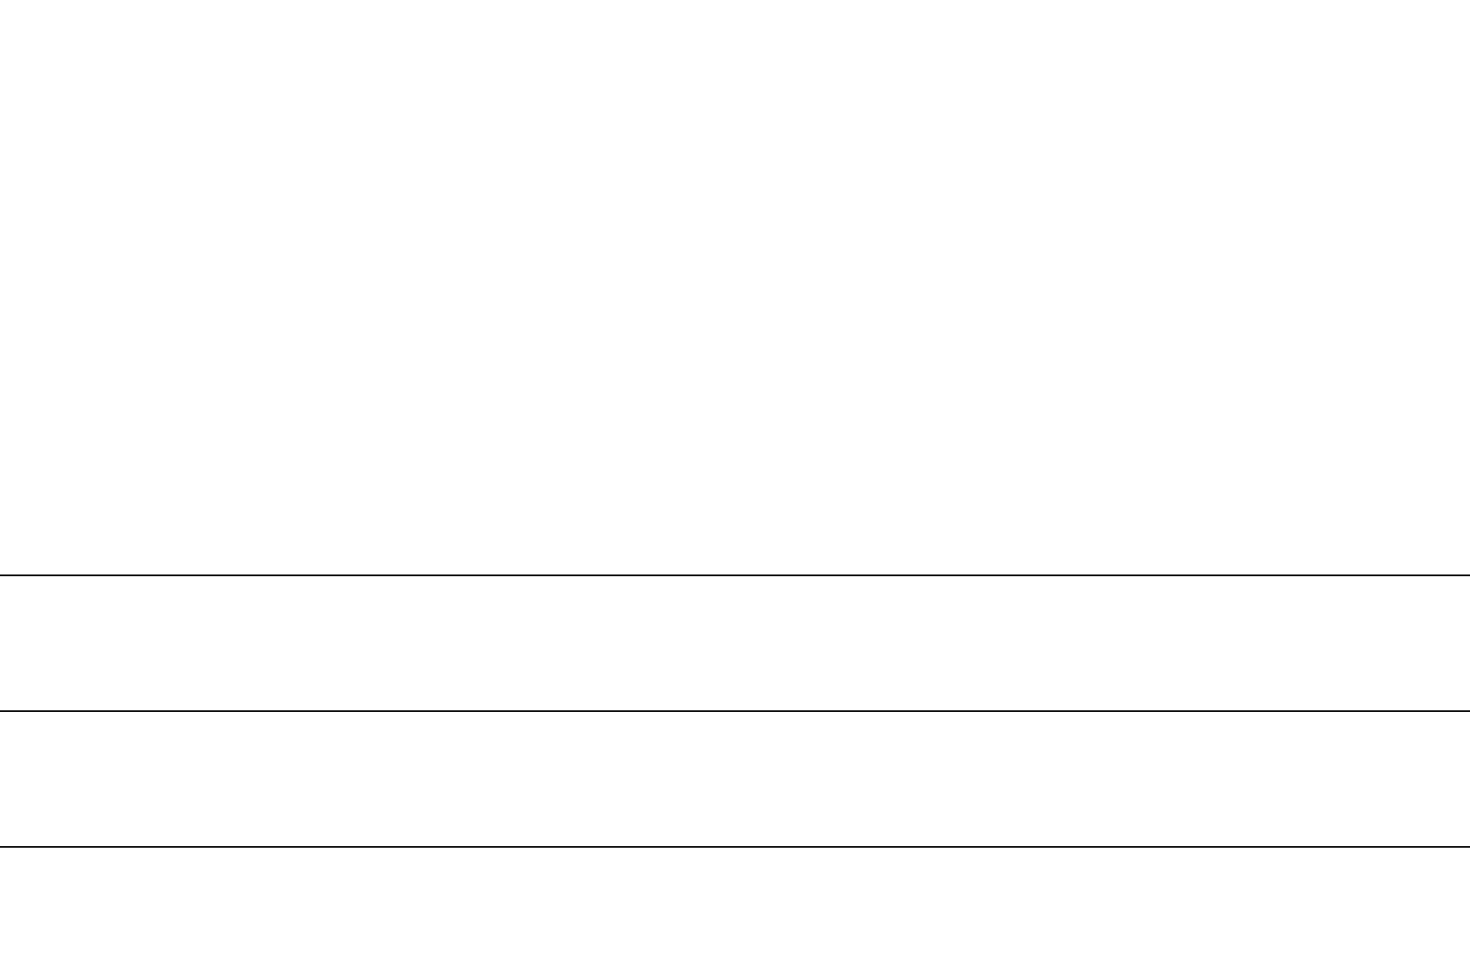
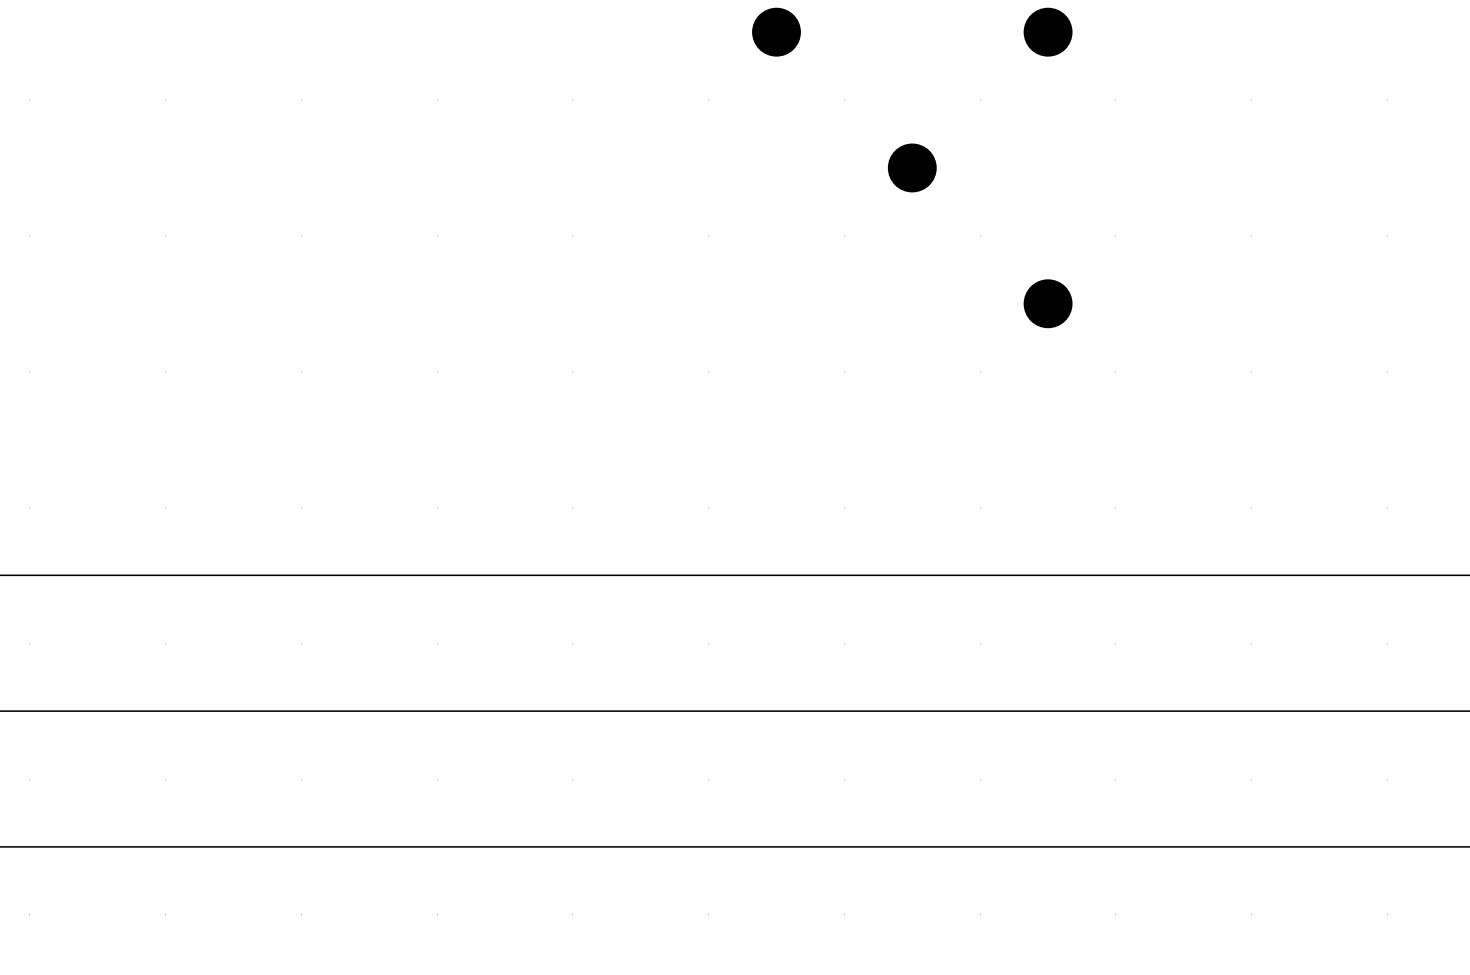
junction: none -> (776, 32)
junction: none -> (1048, 32)
junction: none -> (912, 167)
junction: none -> (1048, 303)

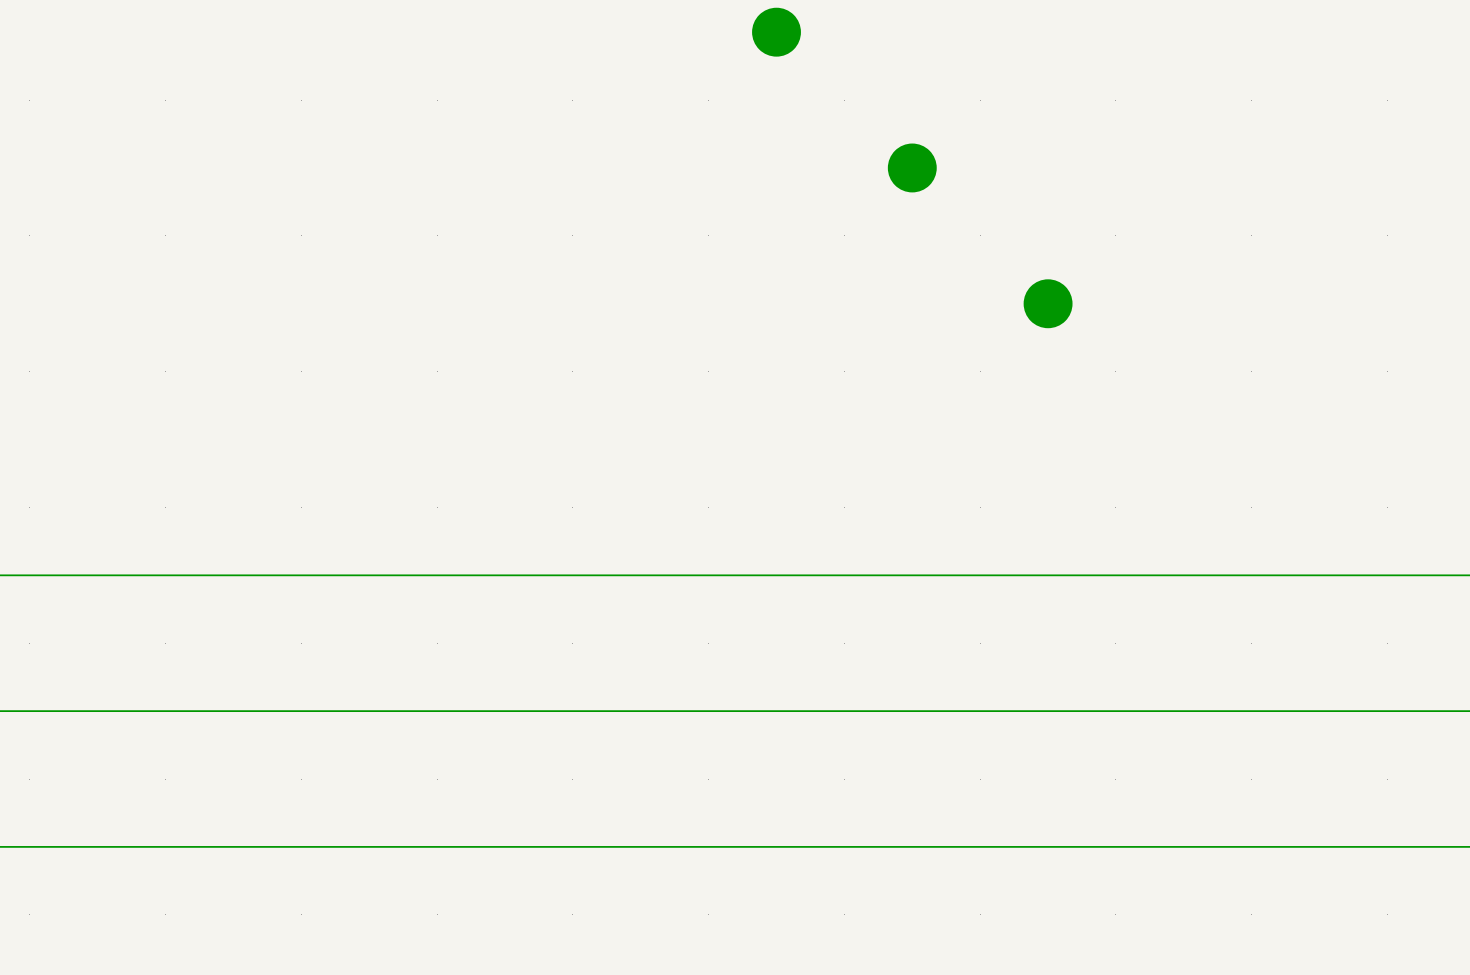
junction: (1048, 32) -> none

